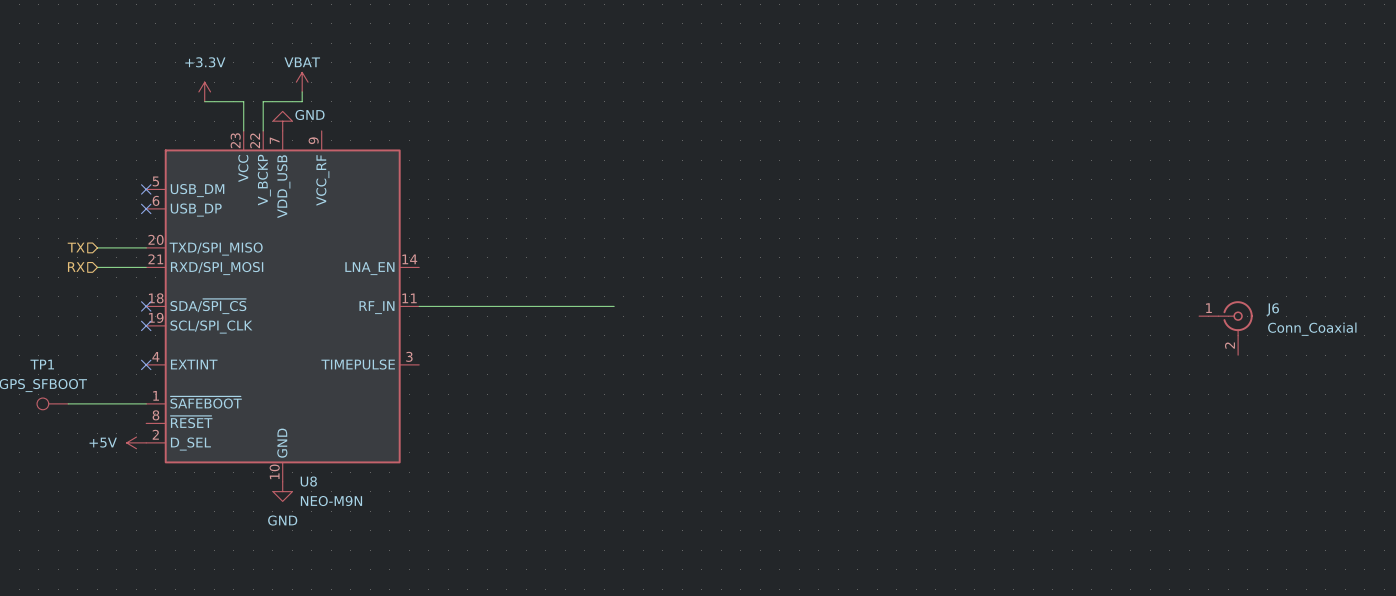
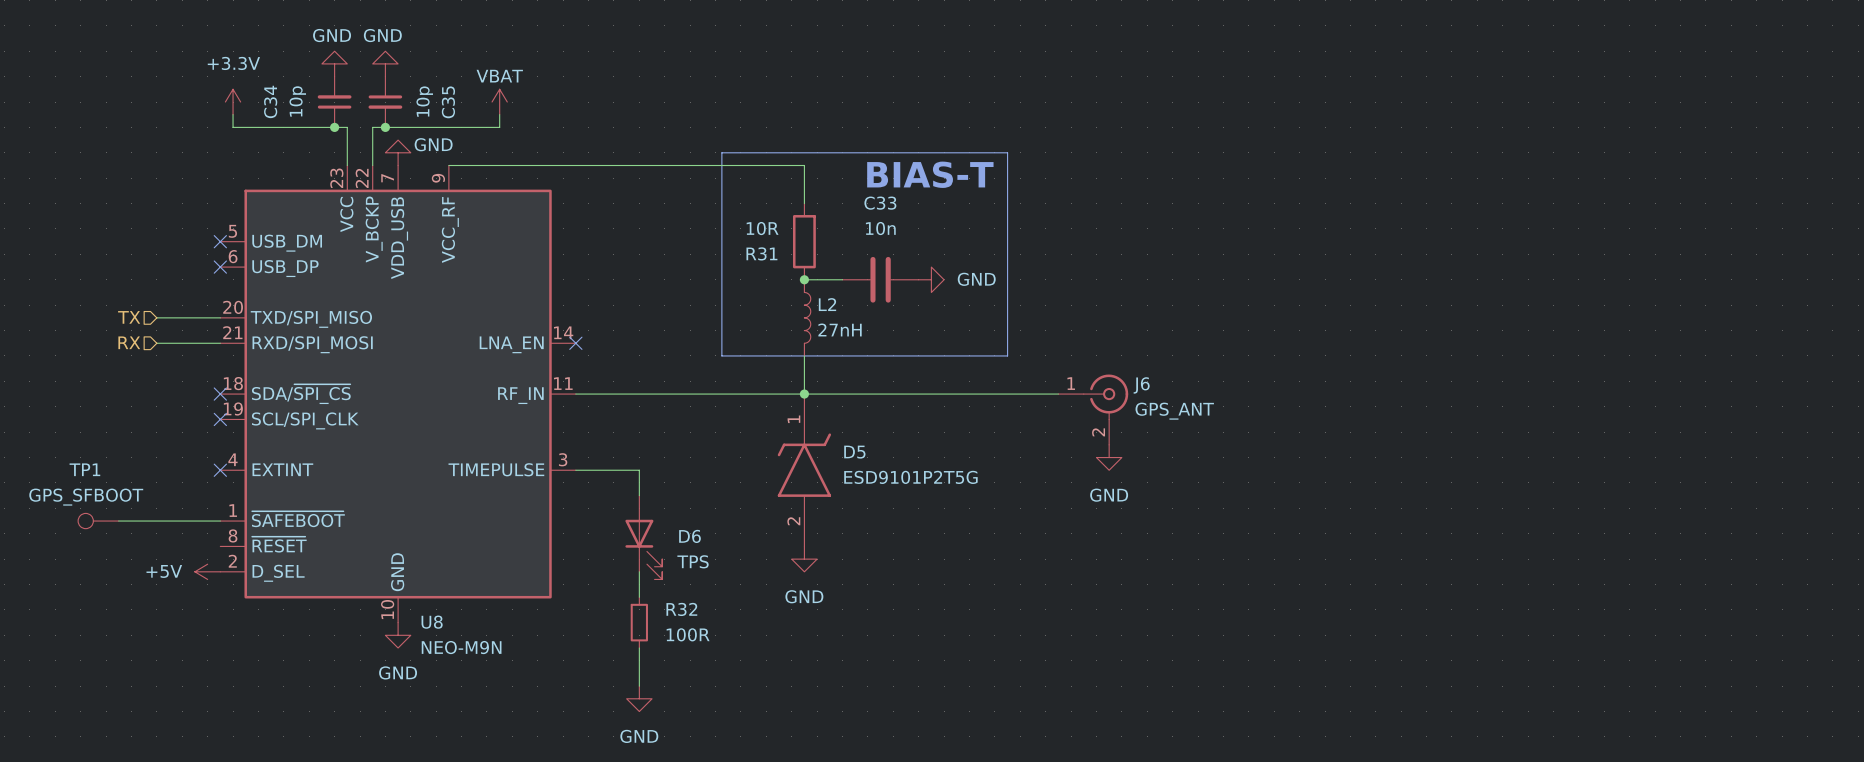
power symbol: none -> GND (334, 63)
power symbol: none -> GND (385, 63)
C34: none -> 10p (334, 102)
C35: none -> 10p (385, 102)
power symbol position: VBAT (302, 82) -> VBAT (499, 102)
wire: none -> (233, 114) (233, 127) (296, 127)
power symbol position: +3.3V (204, 91) -> +3.3V (233, 102)
wire: (302, 91) (302, 101) -> (499, 114) (499, 127) (423, 127)
junction: none -> (334, 127)
junction: none -> (385, 127)
line: none -> (721, 152) (1007, 152) (1007, 355) (721, 355) (721, 152)
wire: none -> (448, 165) (804, 165) (804, 203)
text: none -> BIAS-T (930, 174)
R31: none -> 10R (804, 241)
wire: none -> (804, 279) (842, 279)
junction: none -> (804, 279)
C33: none -> 10n (880, 279)
power symbol: none -> GND (931, 279)
L2: none -> 27nH (807, 317)
no-connect mark: none -> (575, 343)
wire: none -> (804, 355) (804, 394)
junction: none -> (804, 394)
wire: none -> (829, 394) (1058, 394)
J6 name position: J6 (1272, 309) -> J6 (1141, 385)
J6 position: (1225, 328) -> (1093, 409)
J6 value: Conn_Coaxial (1312, 329) -> GPS_ANT (1174, 411)
power symbol: none -> GND (1109, 457)
wire: none -> (575, 470) (639, 470) (639, 495)
D5: none -> ESD9101P2T5G (804, 470)
D6: none -> TPS (643, 537)
power symbol: none -> GND (804, 559)
wire: none -> (639, 571) (639, 597)
R32: none -> 100R (639, 622)
wire: none -> (639, 648) (639, 686)
power symbol: none -> GND (639, 698)

